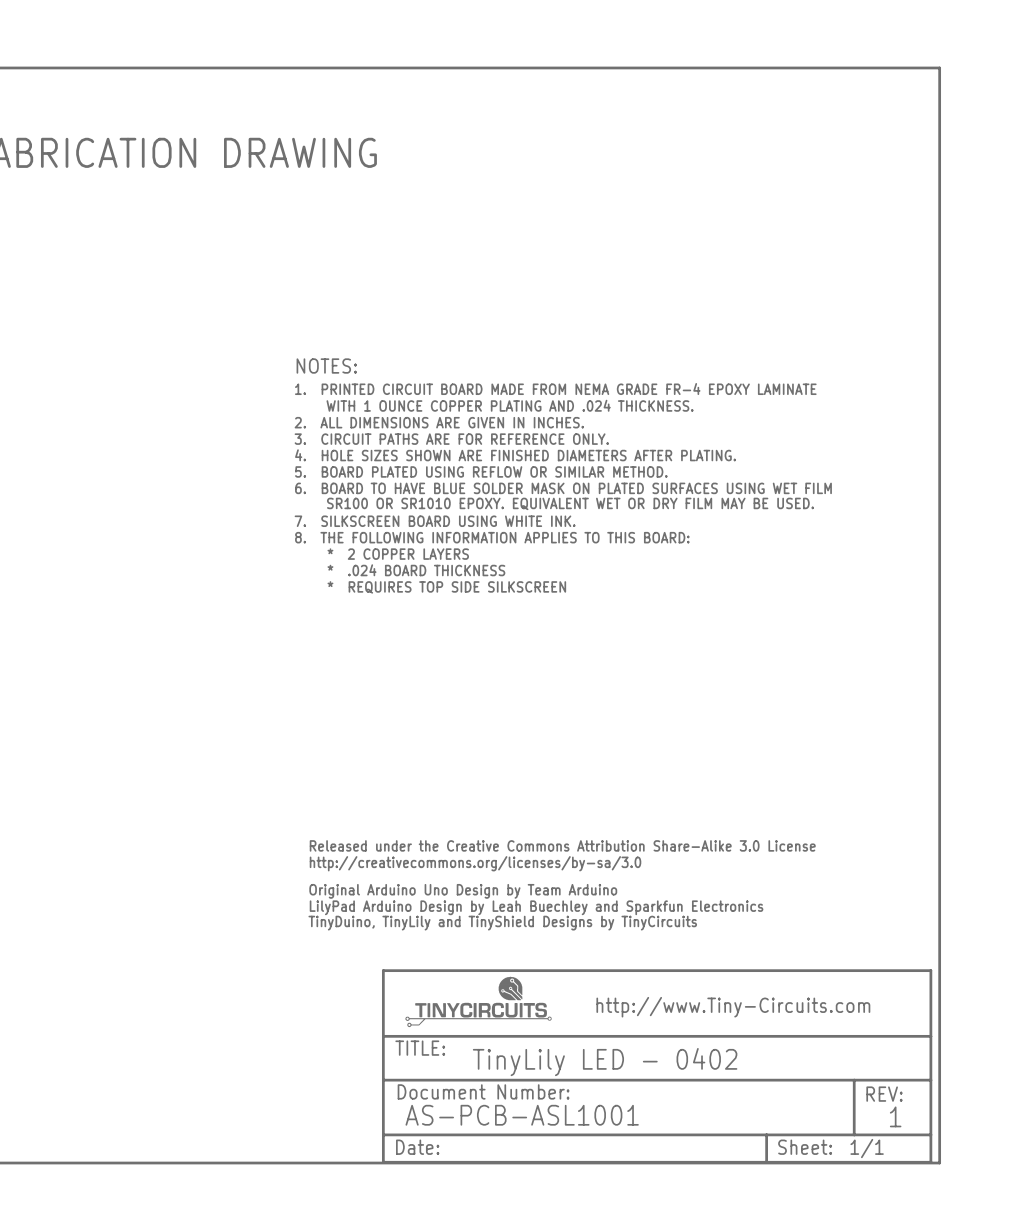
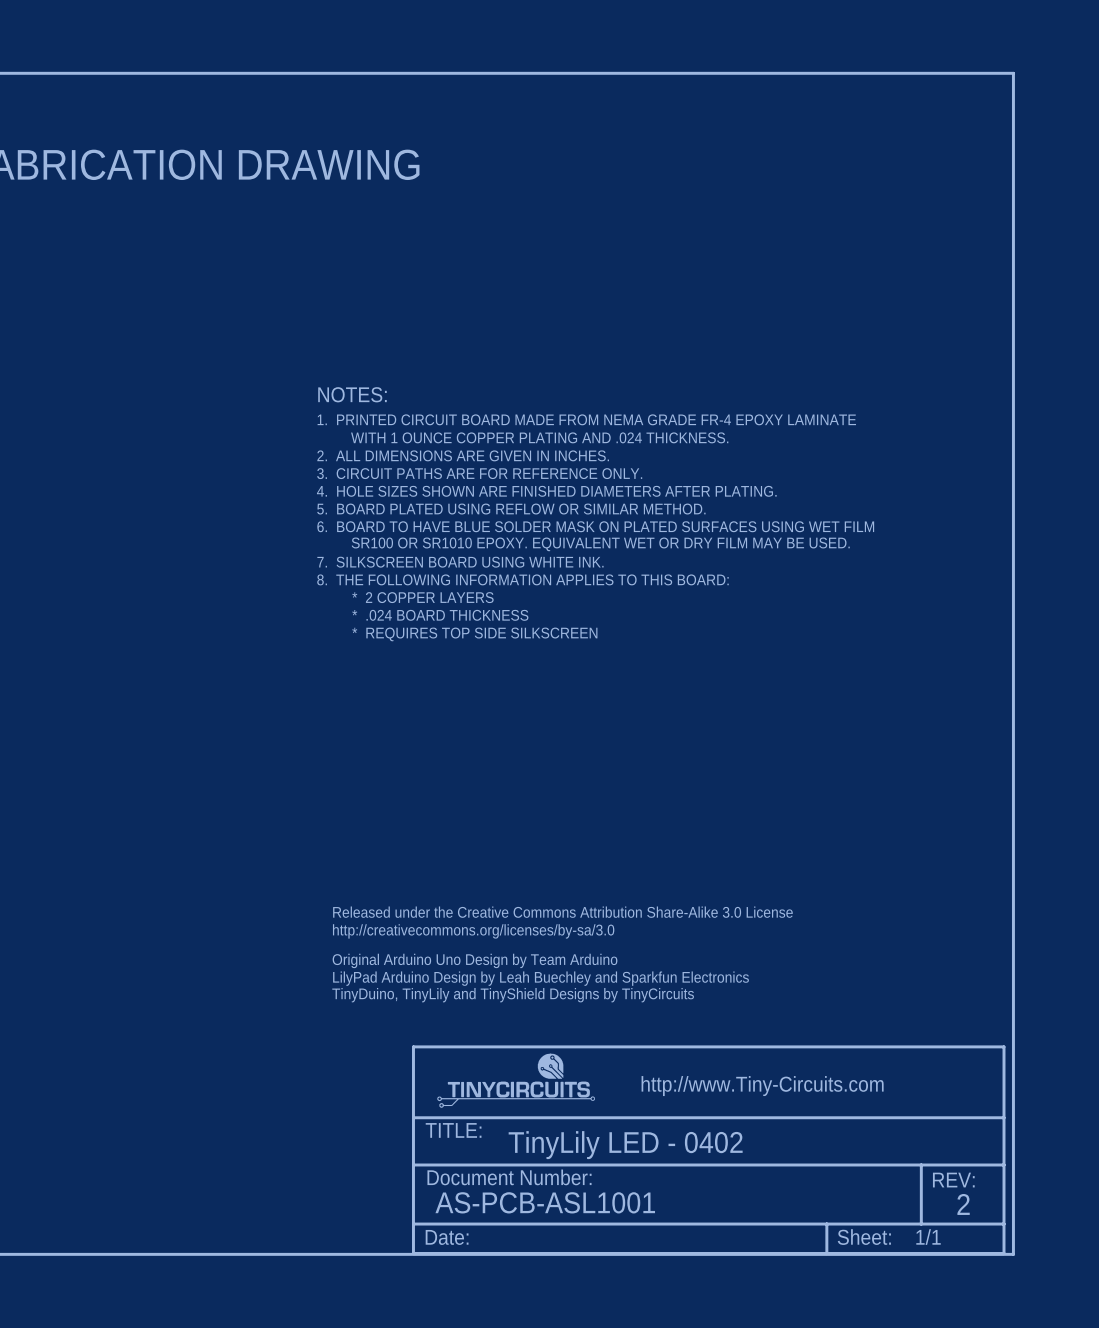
text: 1 (895, 1116) -> 2 (963, 1204)

